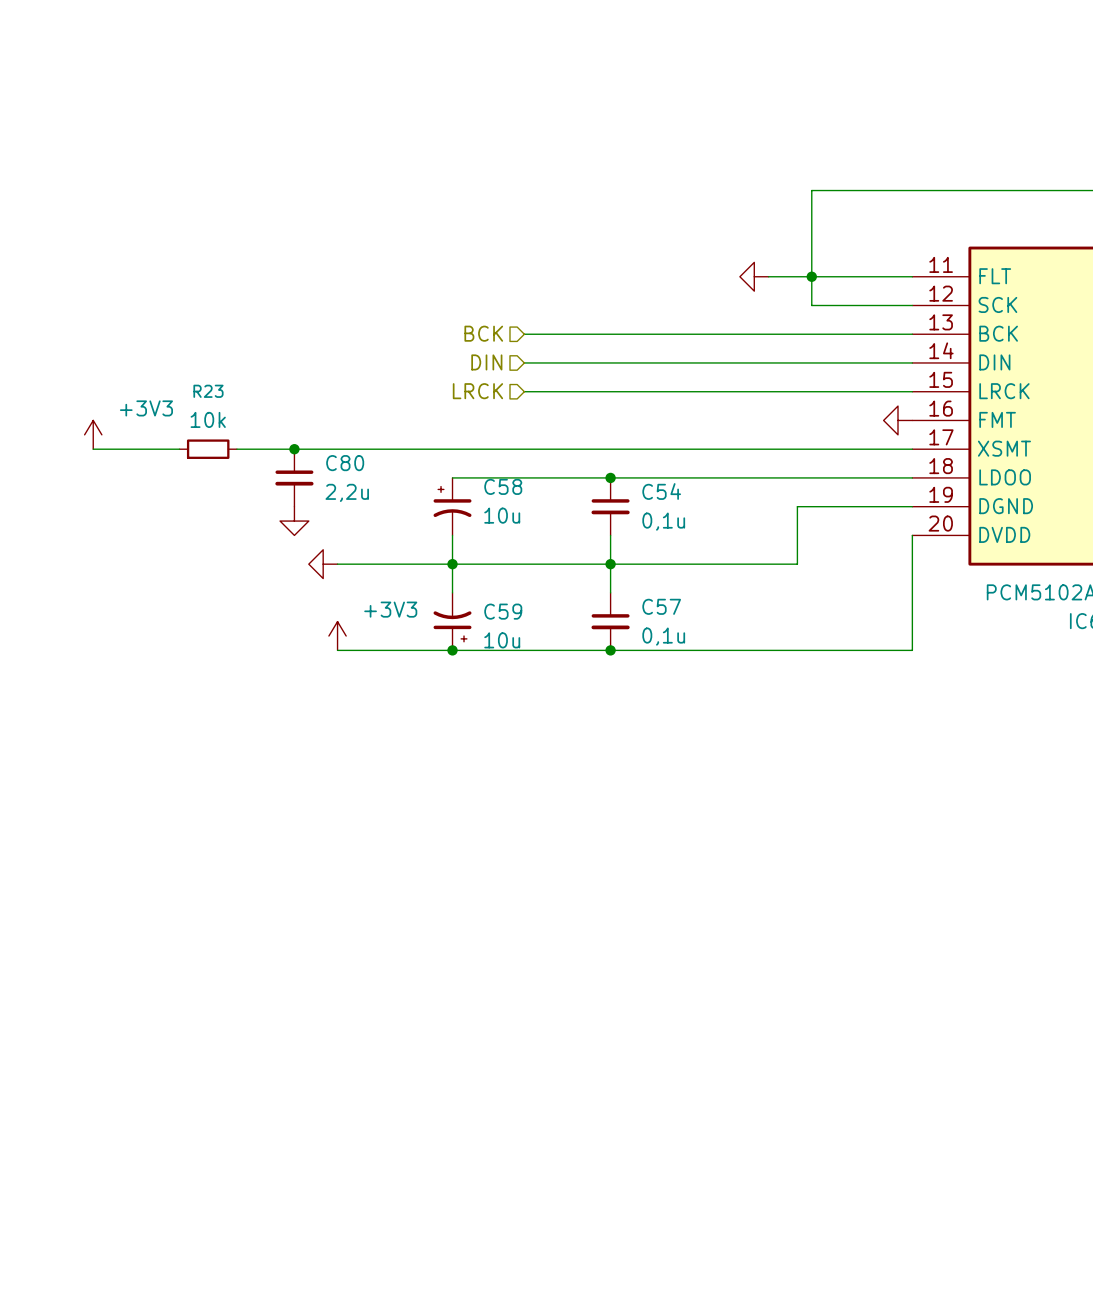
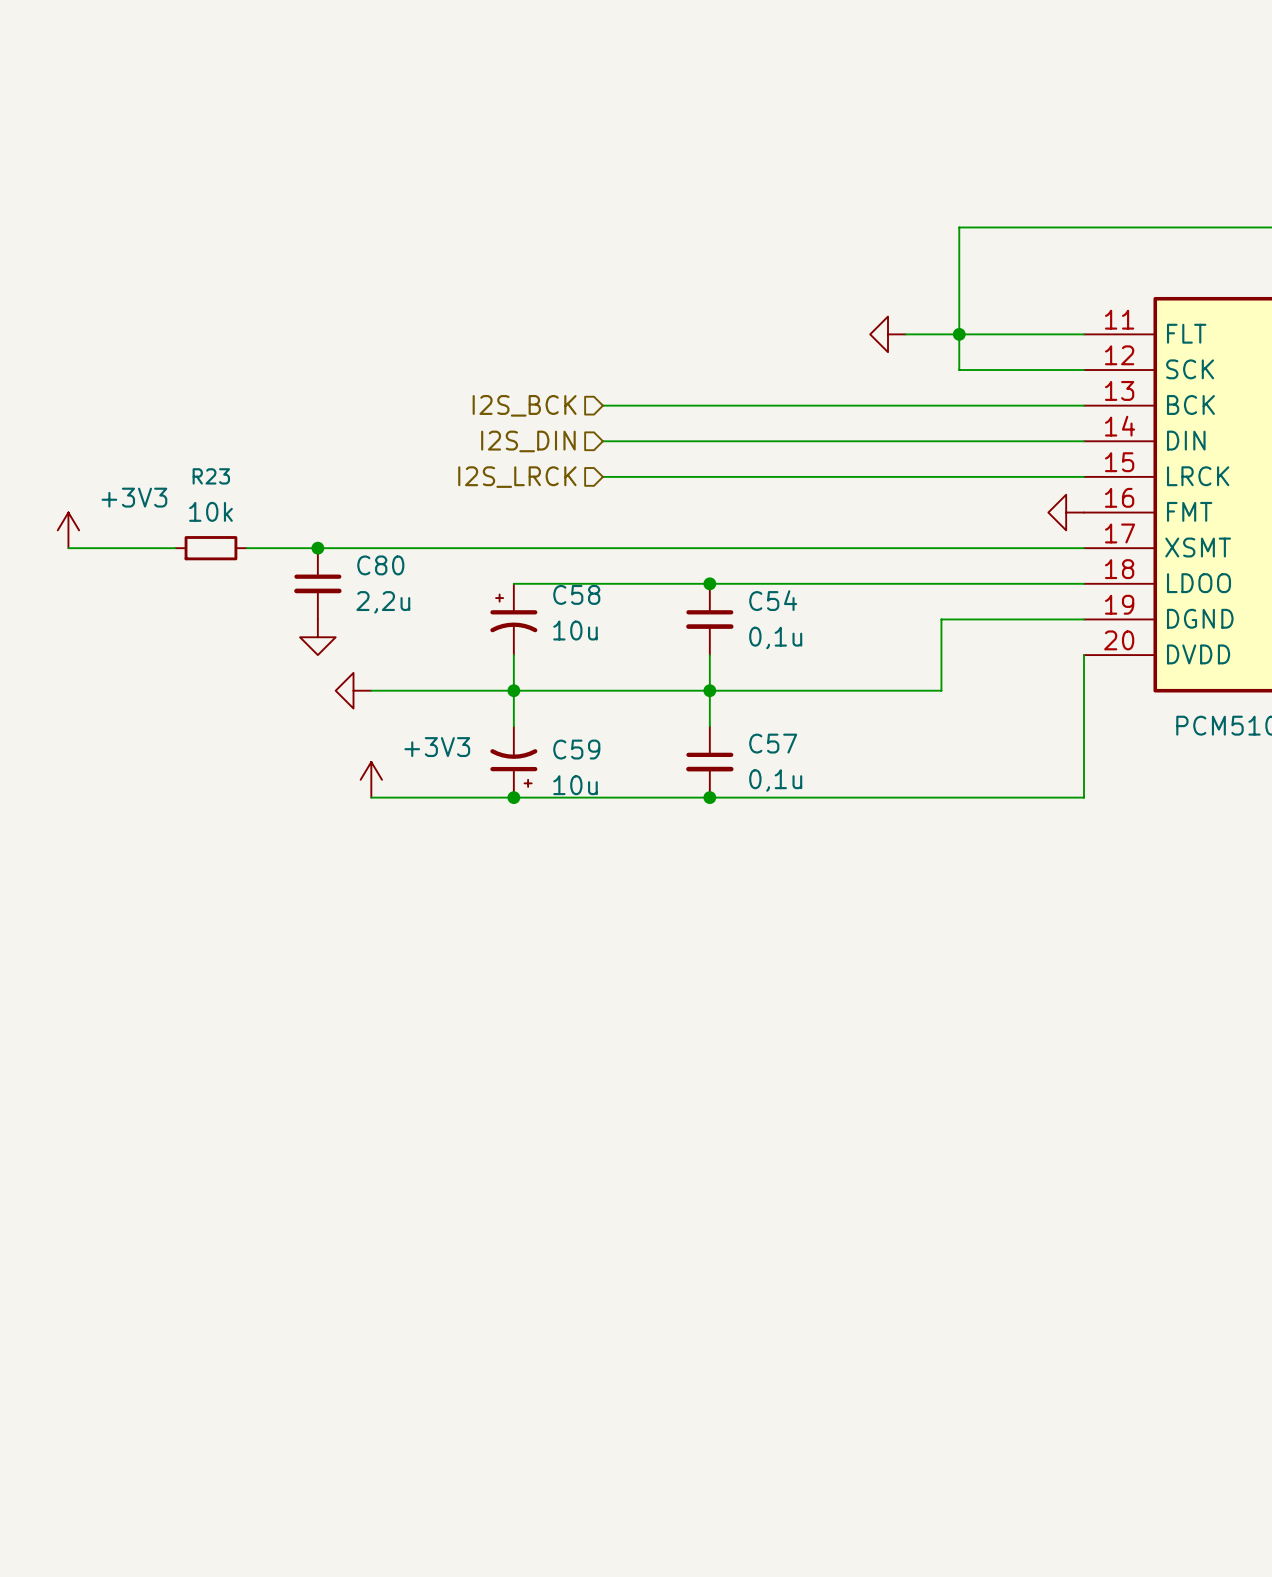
hierarchical label: BCK (483, 333) -> I2S_BCK (524, 405)
hierarchical label: DIN (486, 362) -> I2S_DIN (528, 441)
hierarchical label: LRCK (477, 391) -> I2S_LRCK (517, 477)

